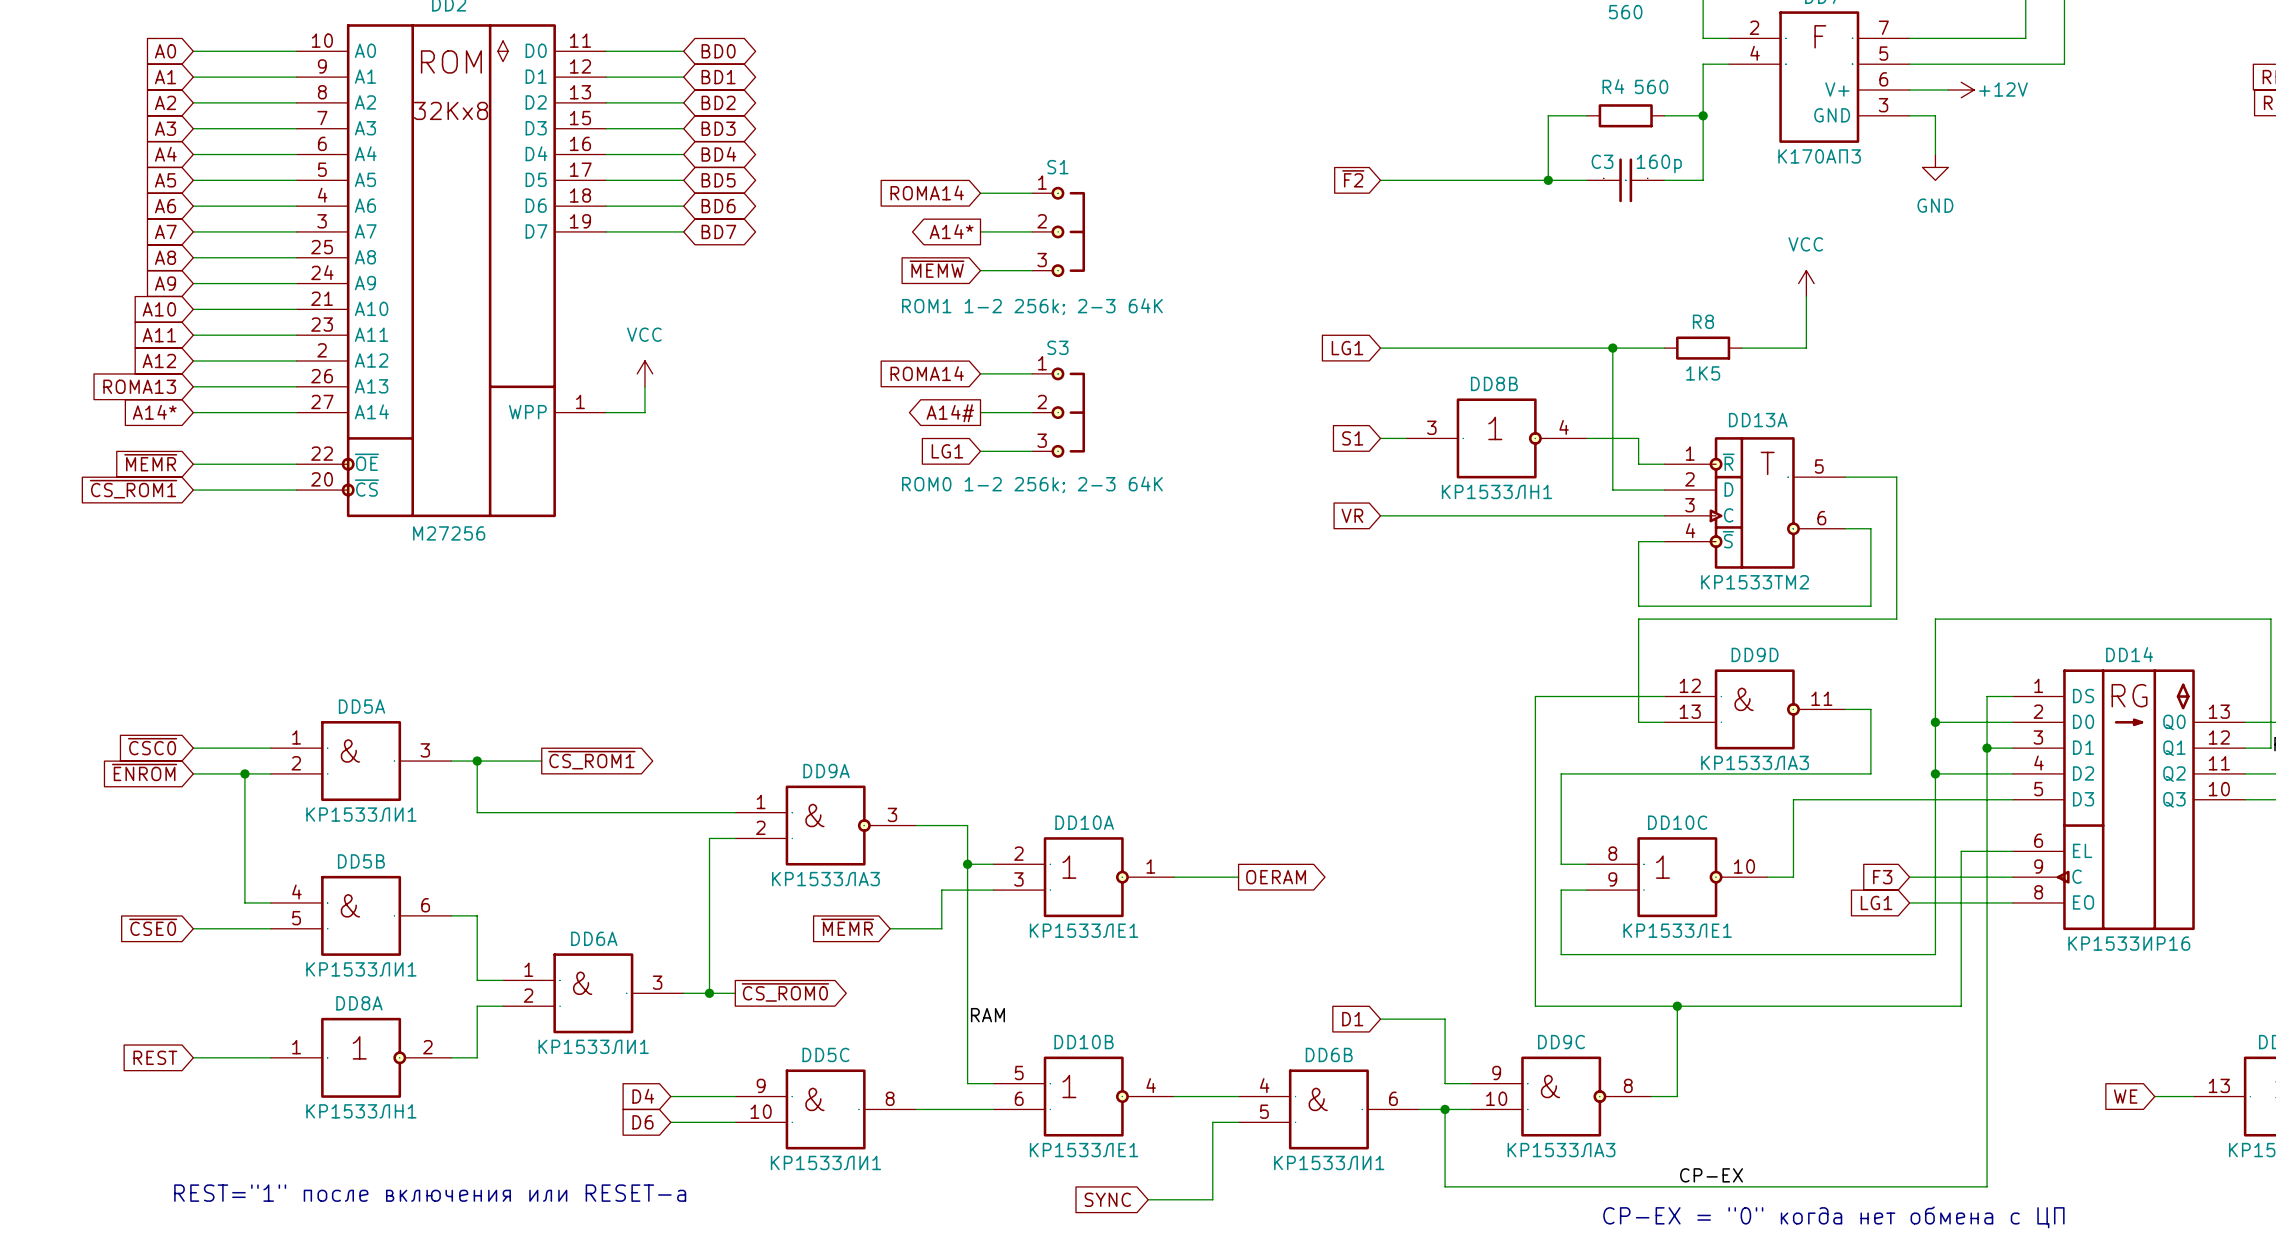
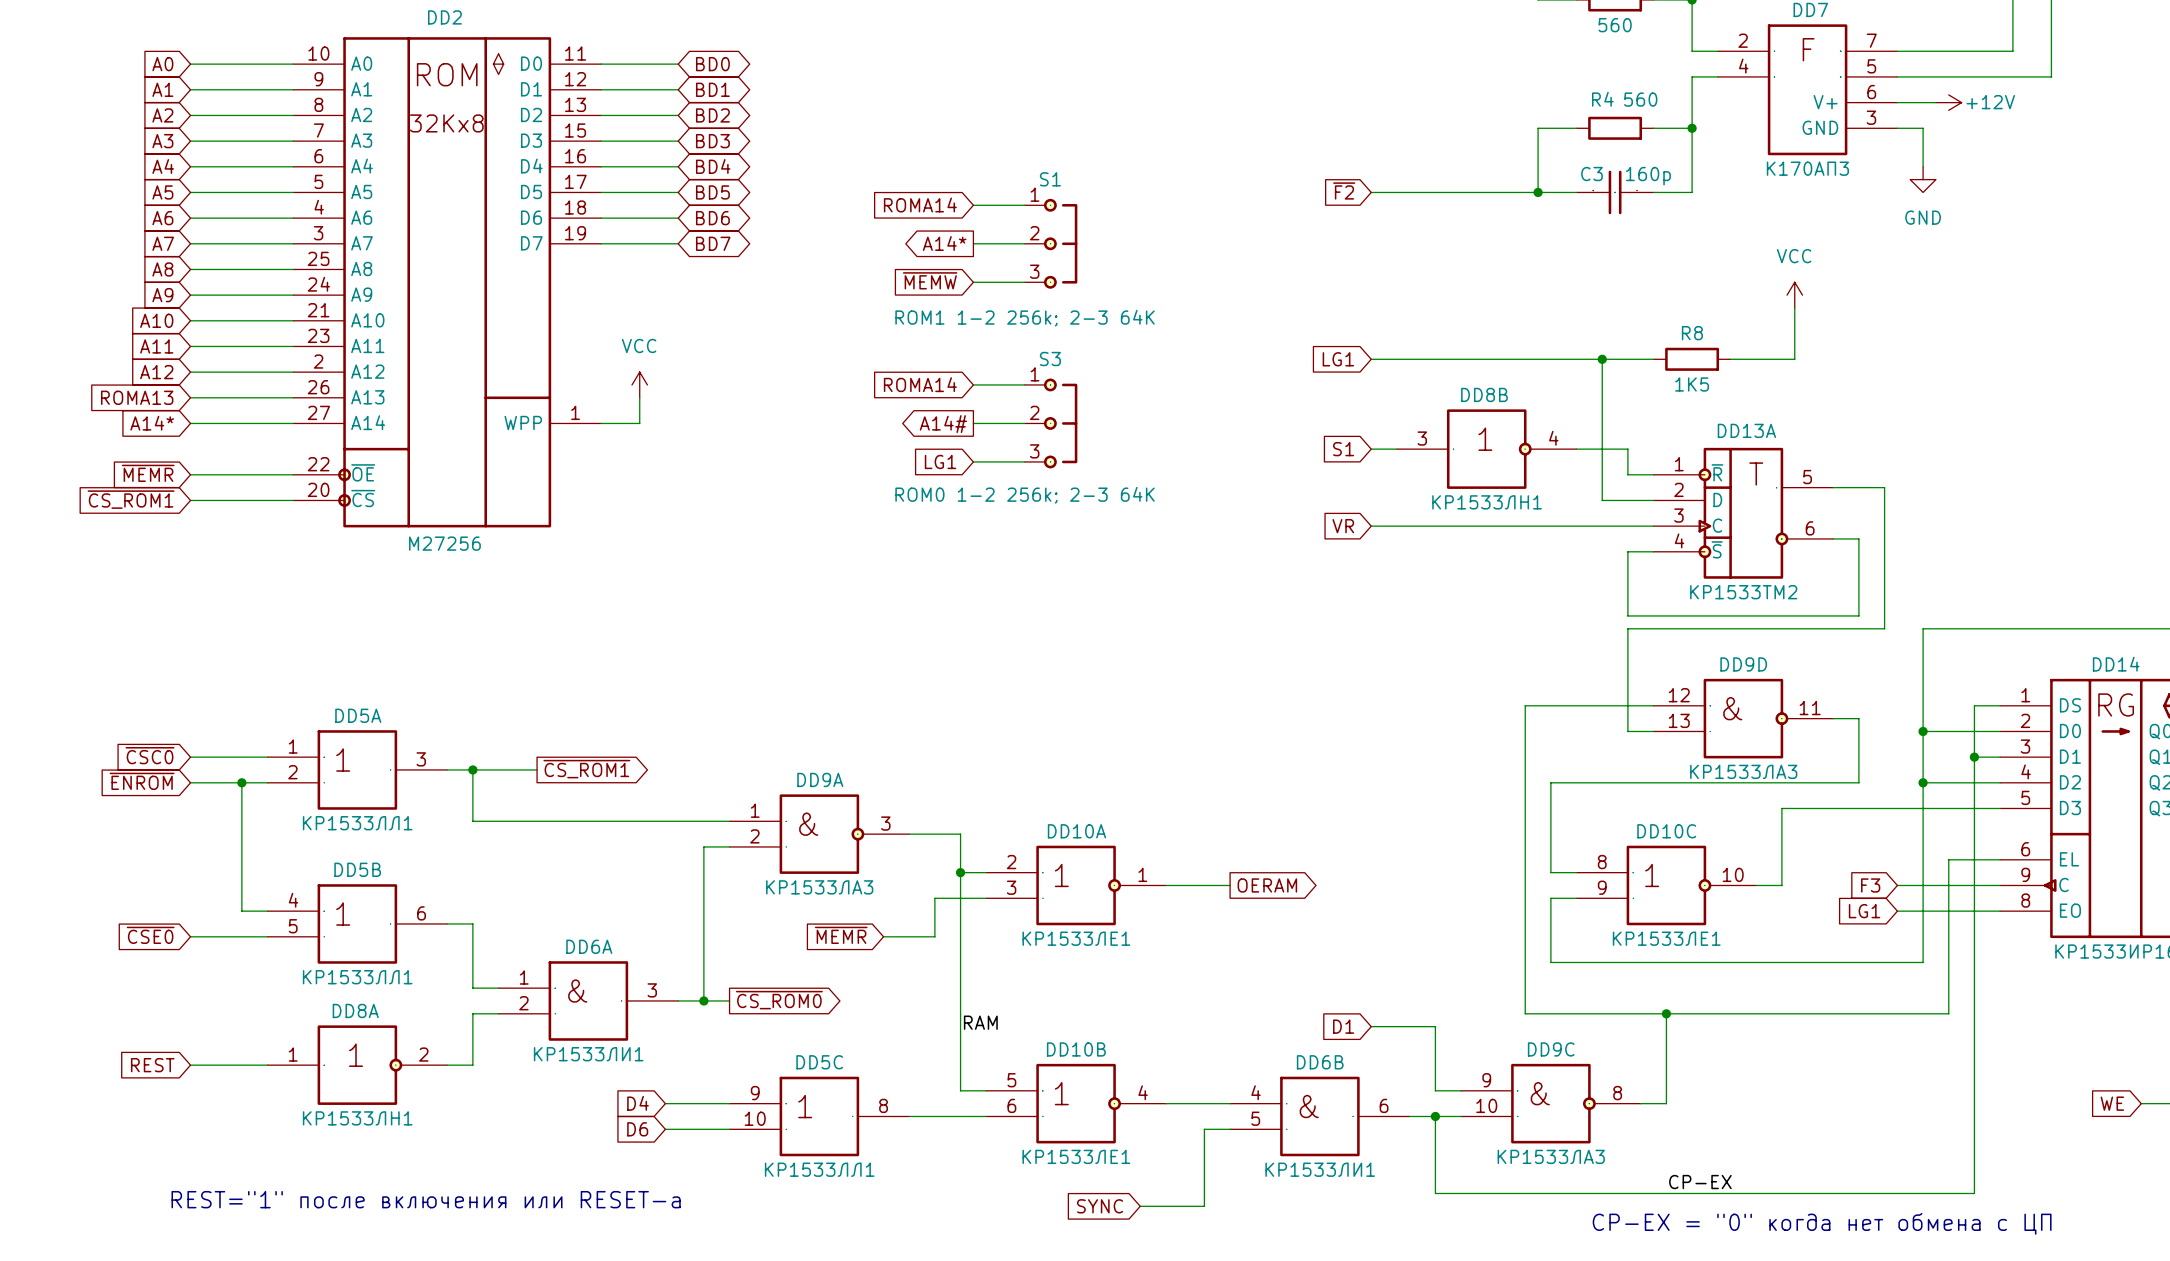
DD5A text: & (350, 750) -> 1 (343, 760)
DD5A value: КР1533ЛИ1 (361, 814) -> КР1533ЛЛ1 (357, 823)
DD5B text: & (350, 905) -> 1 (343, 914)
DD5B value: КР1533ЛИ1 (361, 969) -> КР1533ЛЛ1 (357, 977)
DD5C text: & (814, 1099) -> 1 (805, 1106)
DD5C value: КР1533ЛИ1 (825, 1162) -> КР1533ЛЛ1 (819, 1169)

